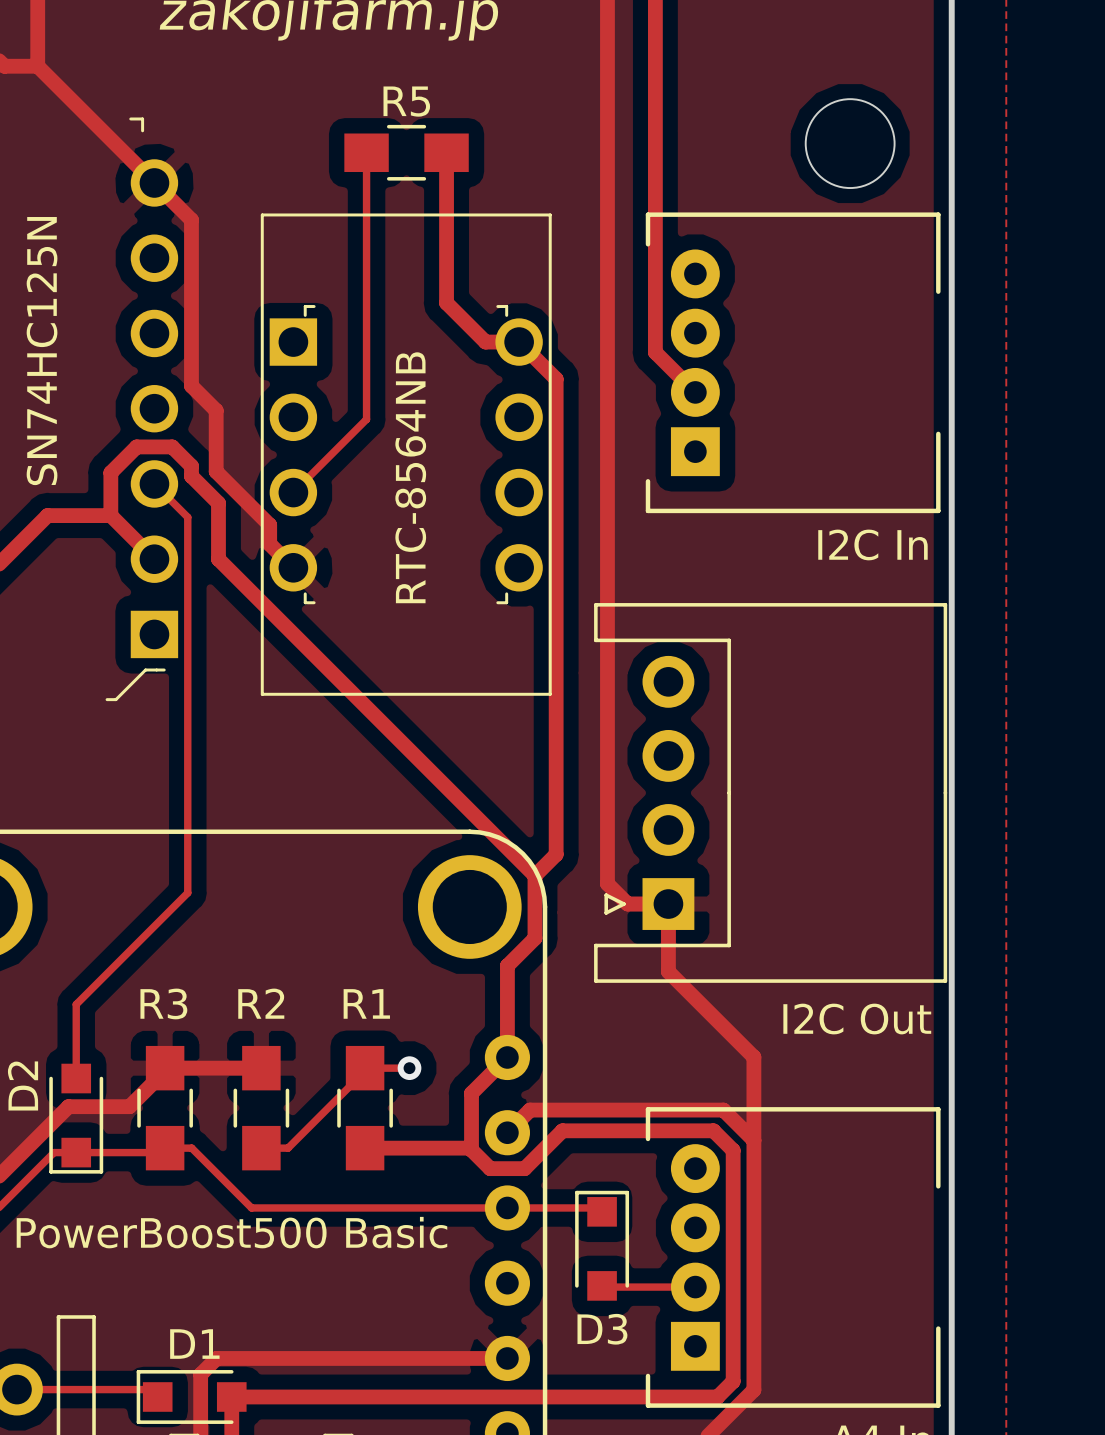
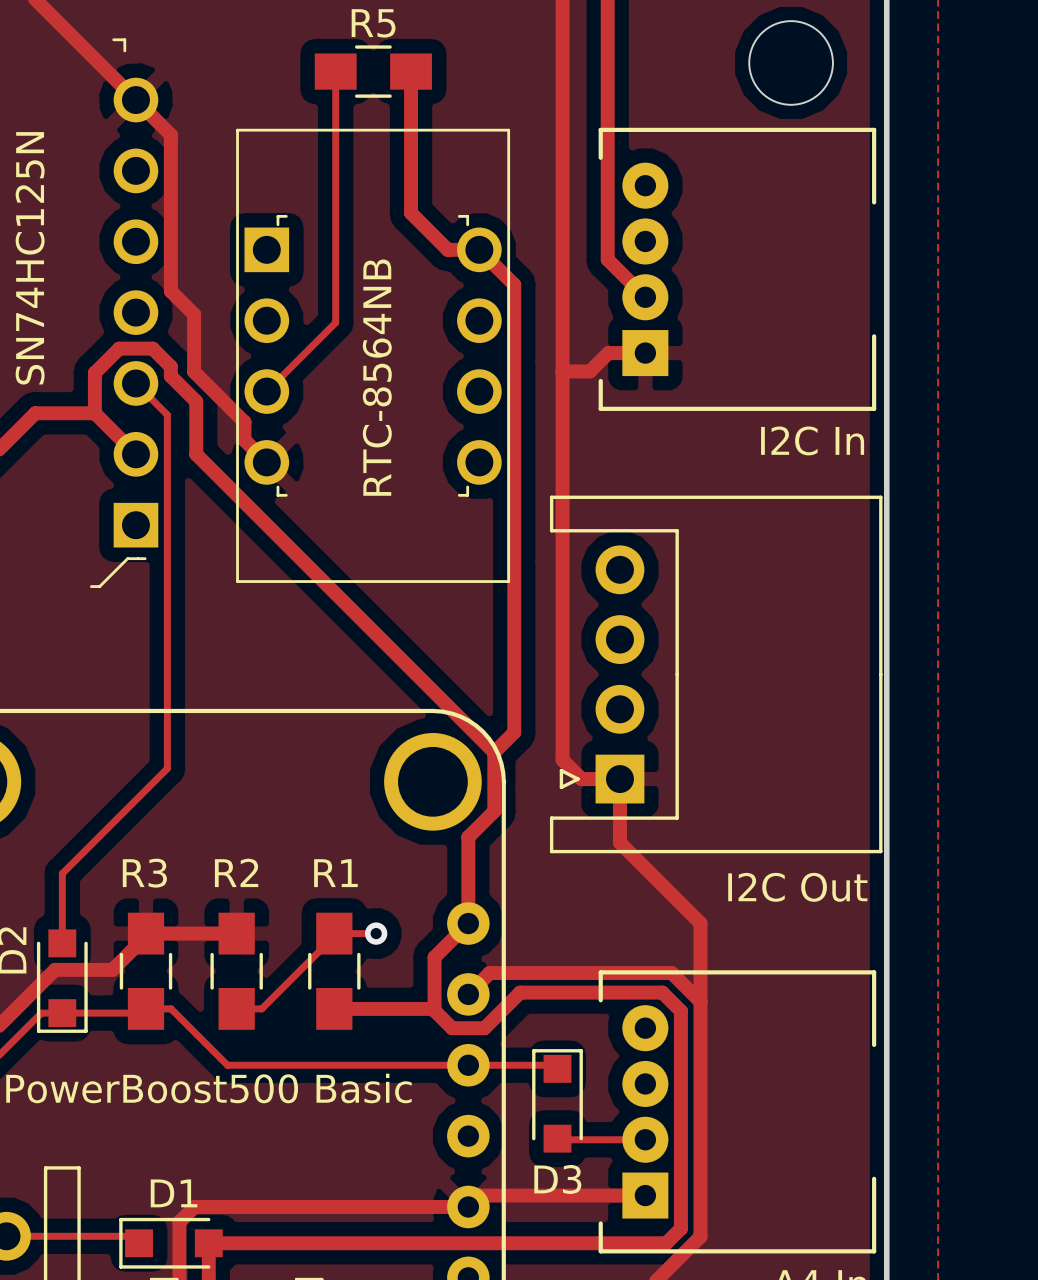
track: none -> (645, 353) (608, 353) (589, 371) (562, 371)
track: none -> (645, 1195) (479, 1195) (468, 1206)

